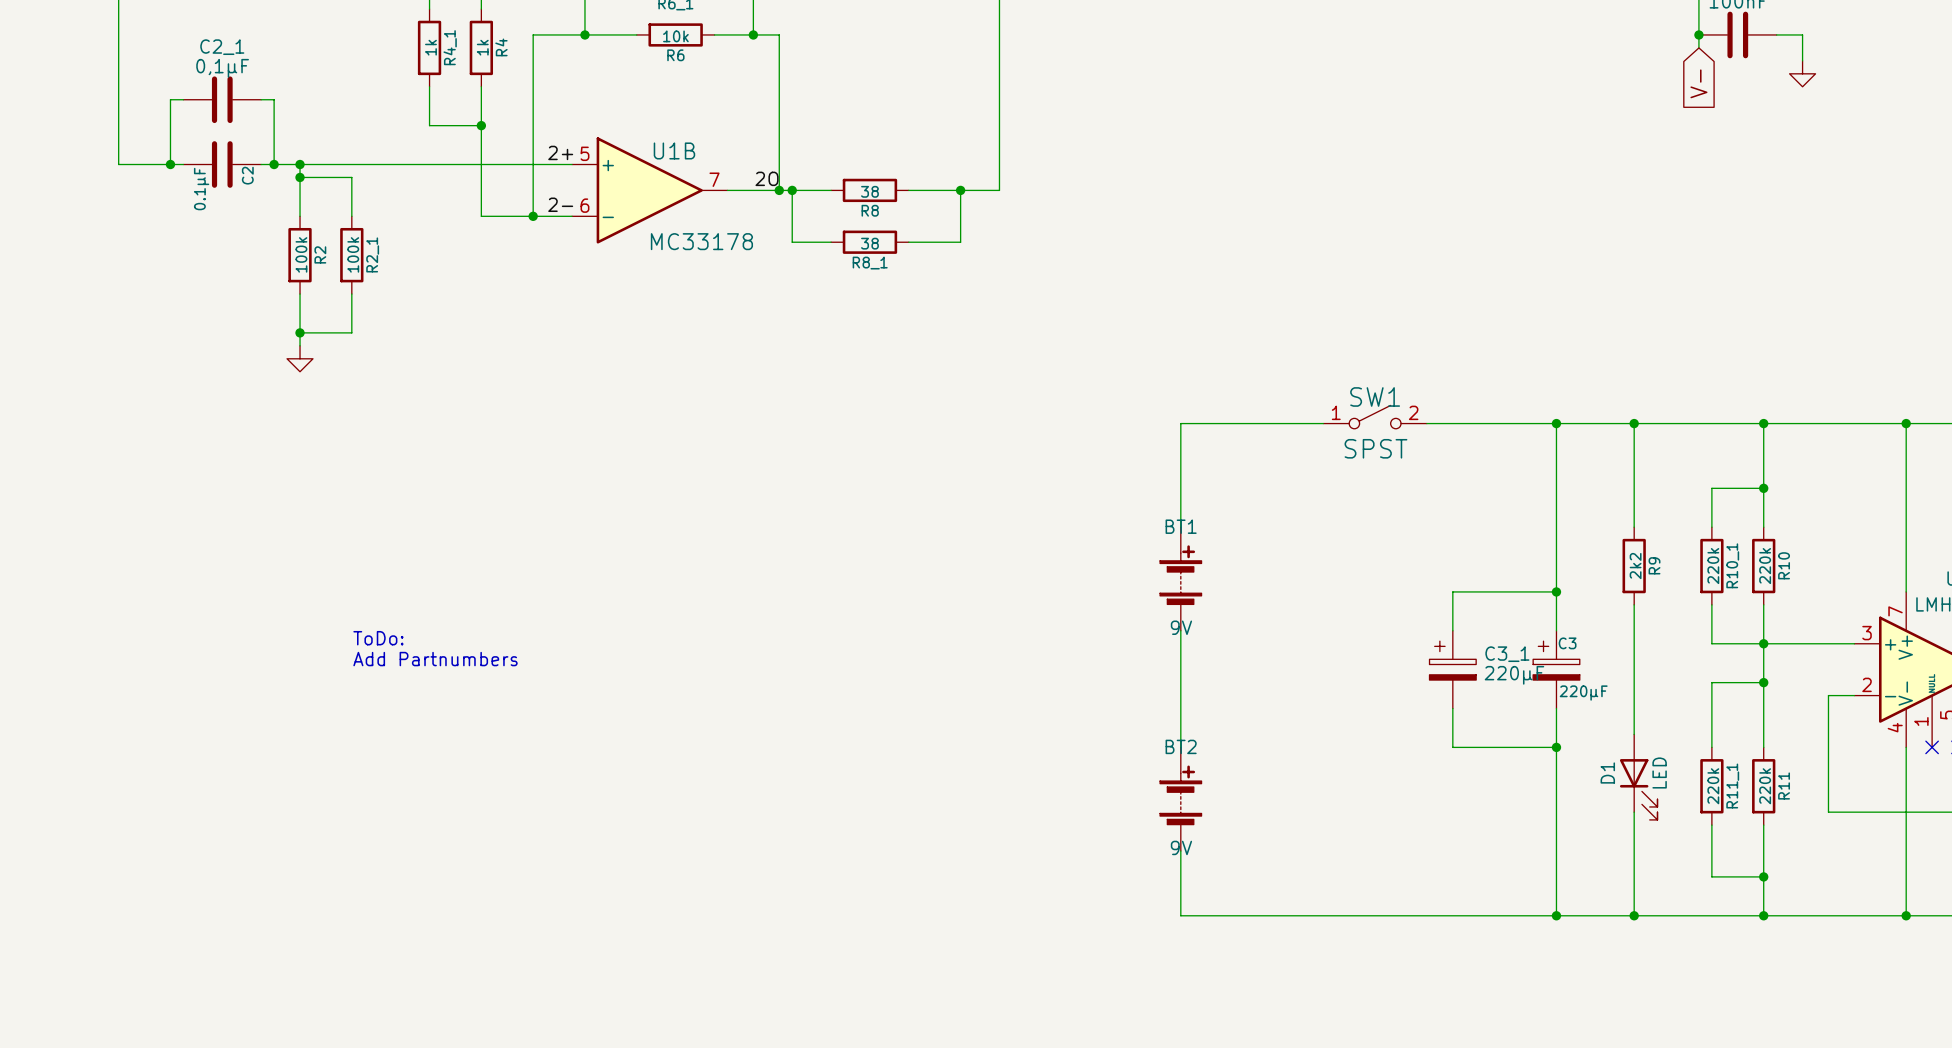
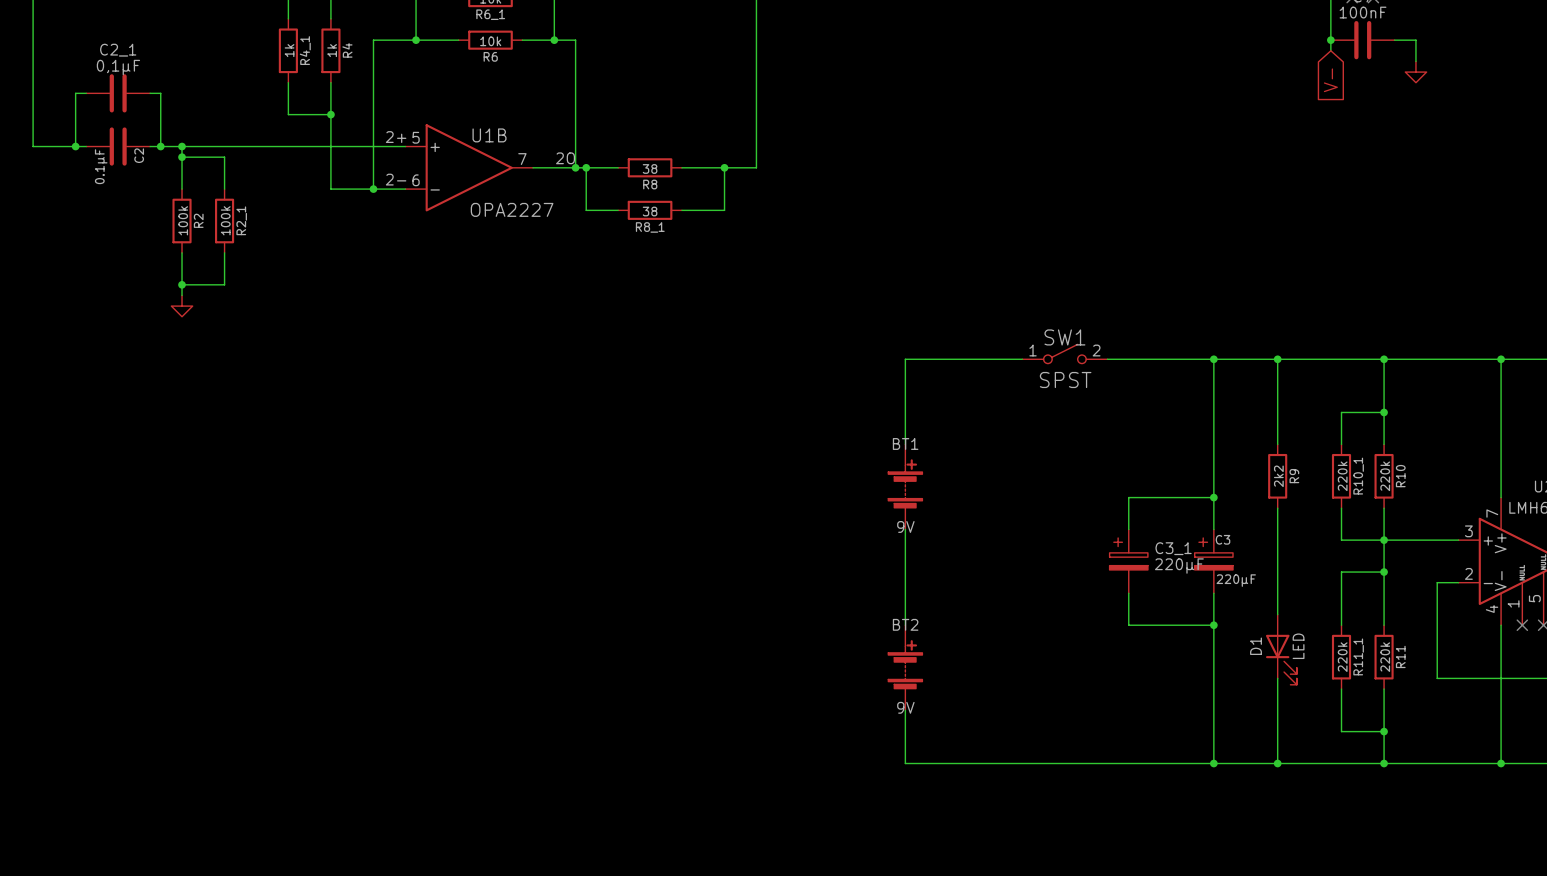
U1B value: MC33178 (701, 241) -> OPA2227 (512, 209)
text: ToDo: (378, 638) -> none
text: Add Partnumbers (435, 659) -> none

